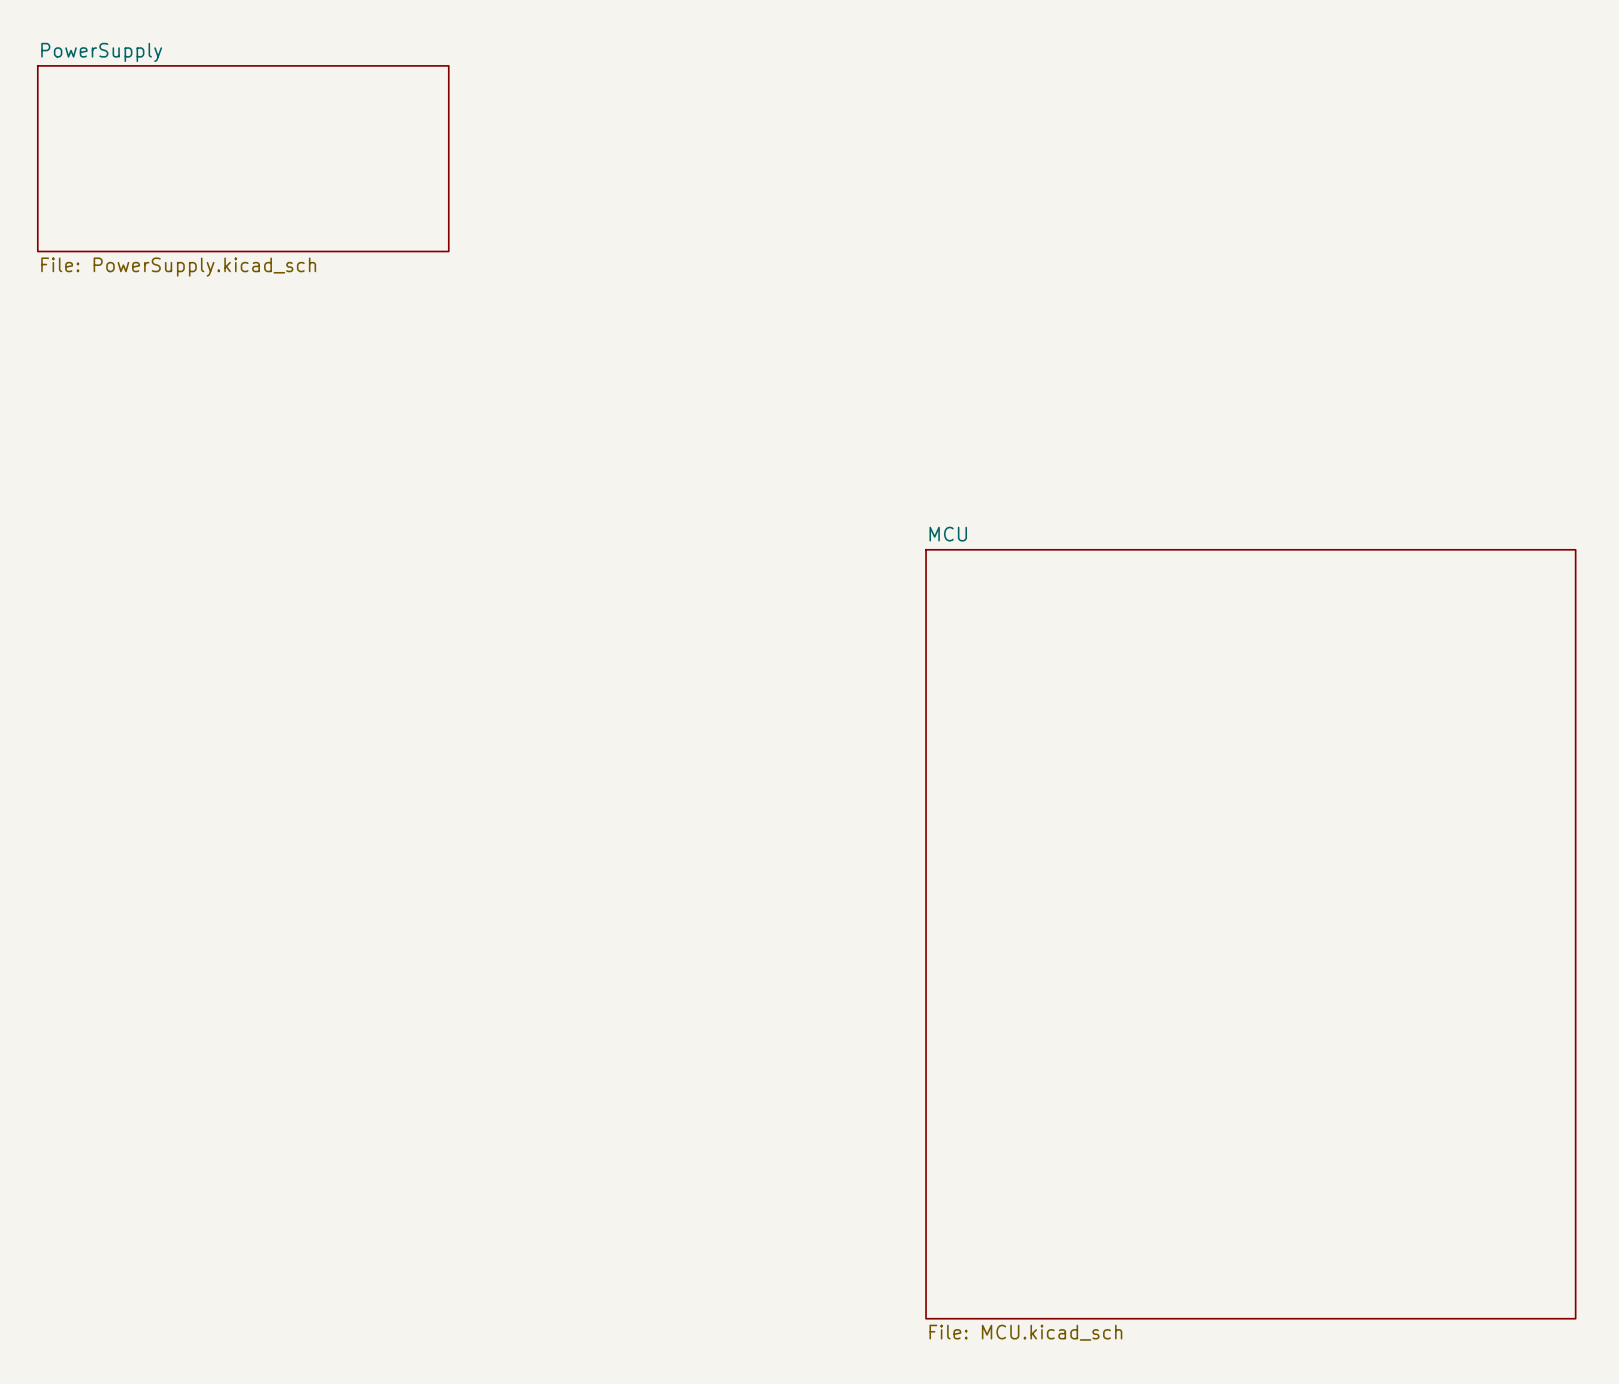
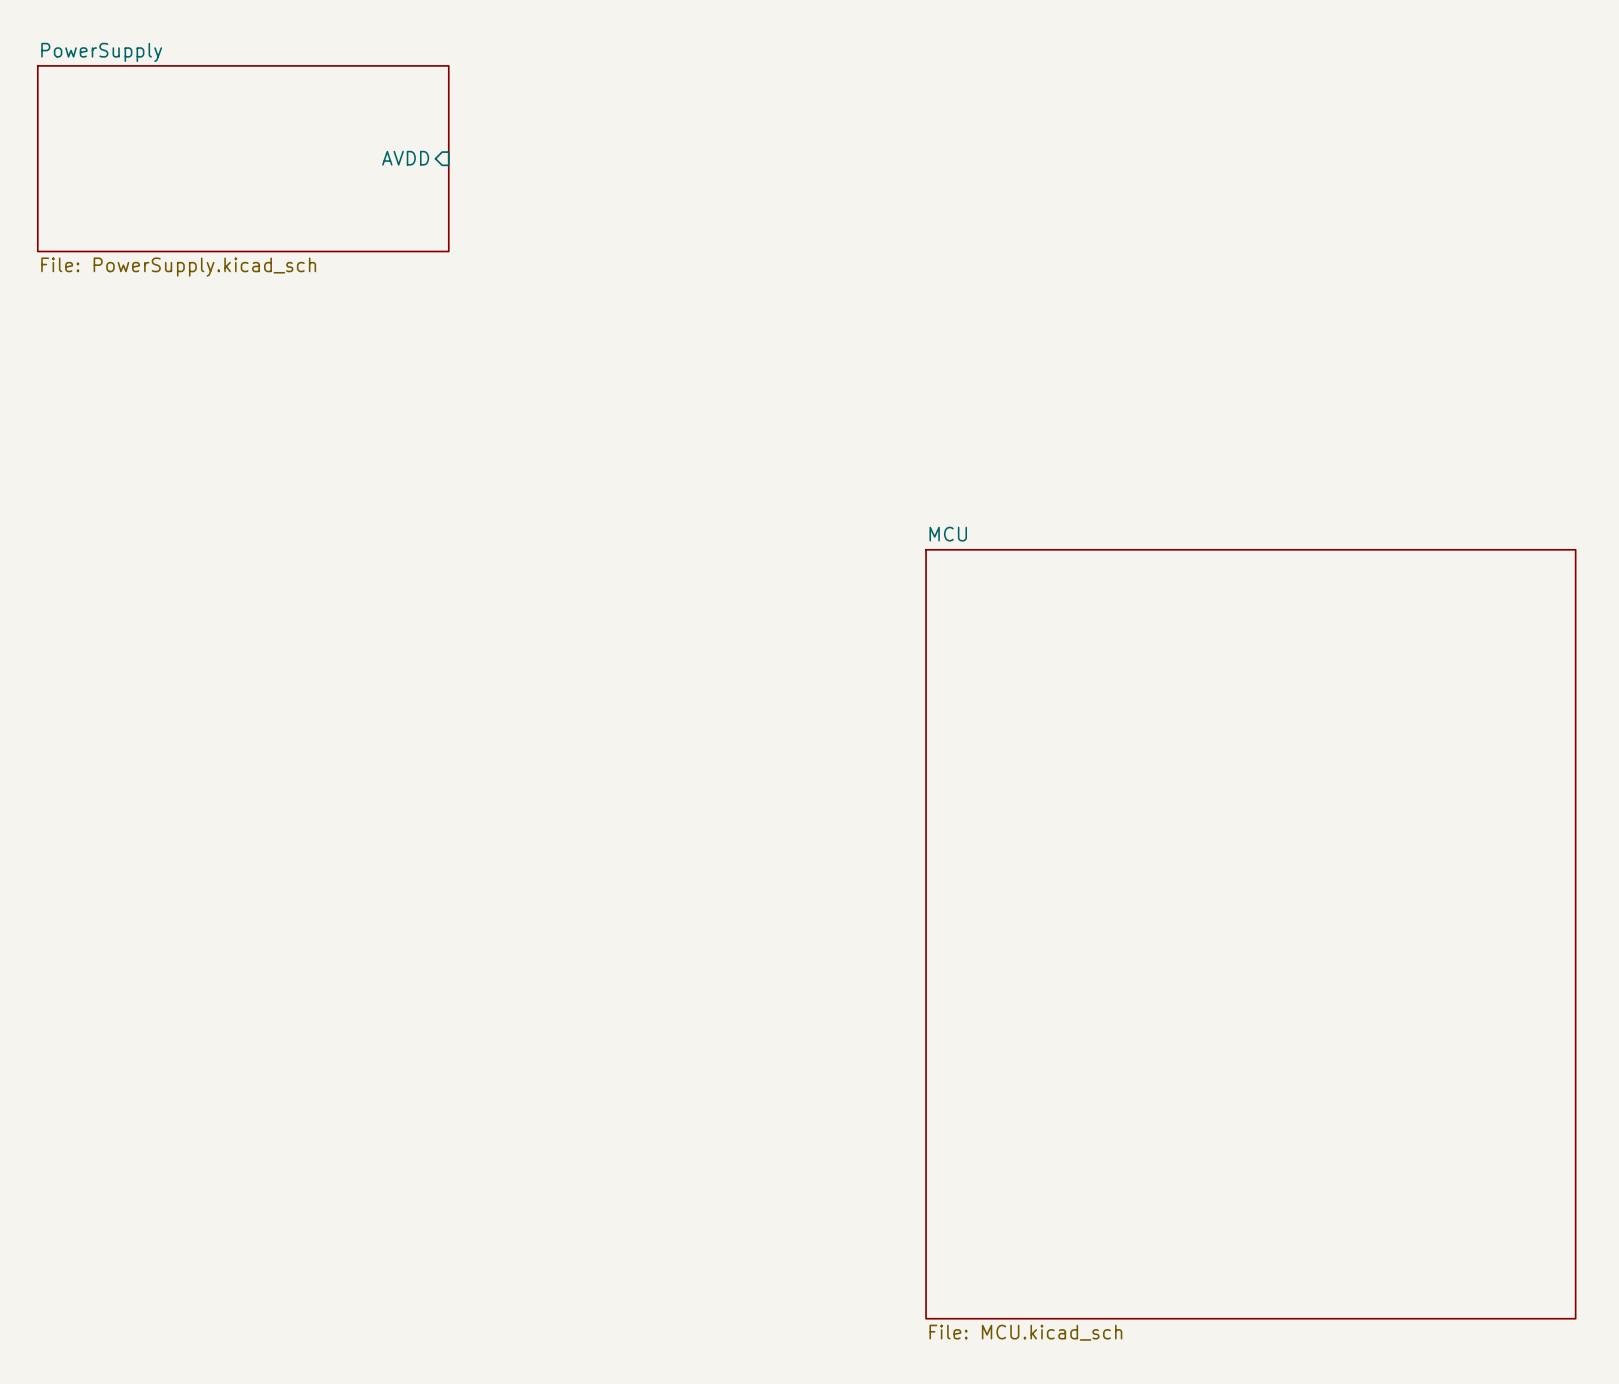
sheet pin: none -> AVDD (405, 158)

